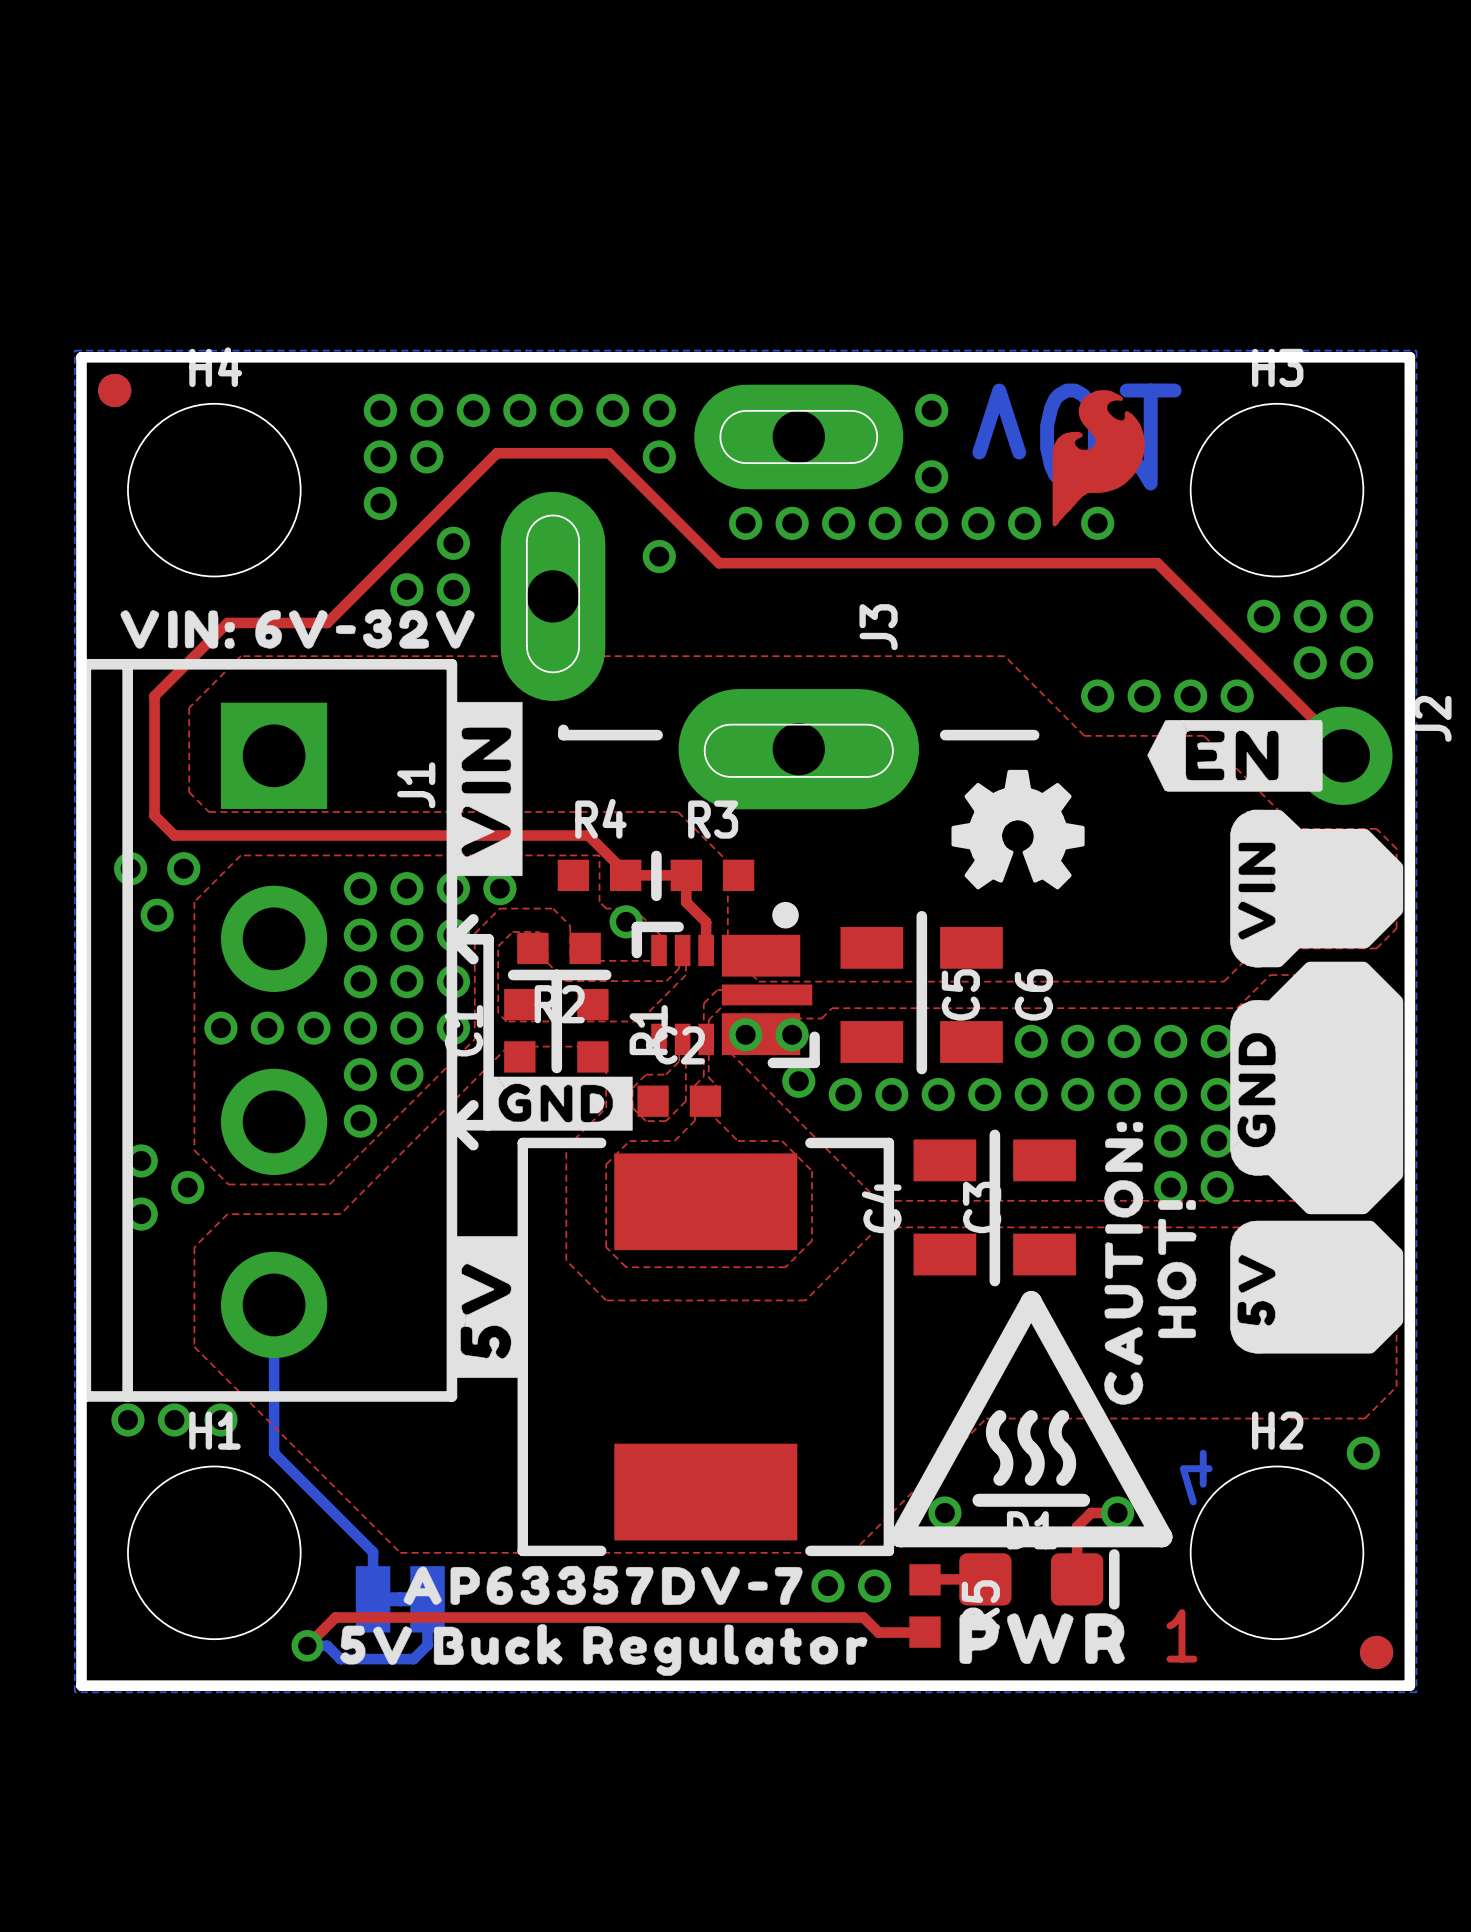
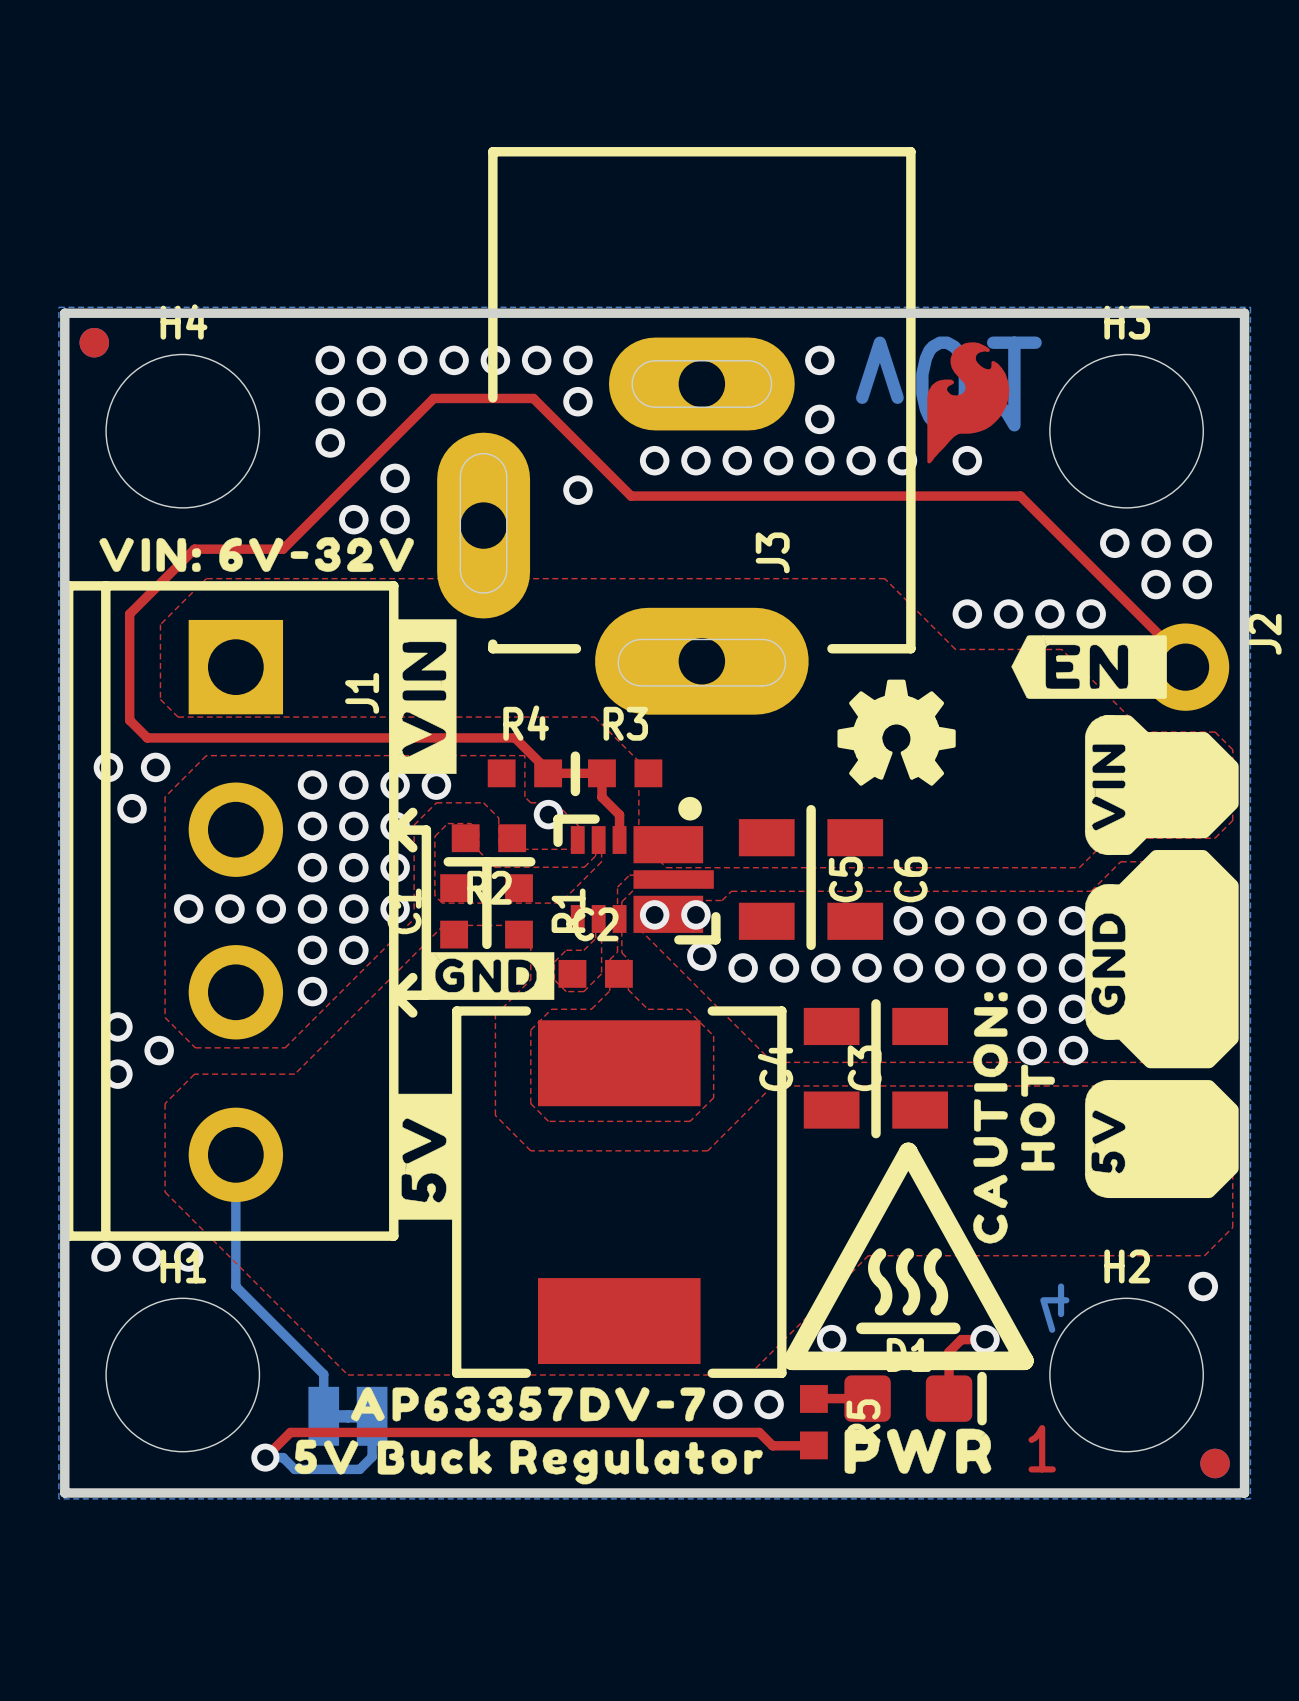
J3 footprint: [500, 384, 1040, 810] -> [437, 147, 916, 715]
drawing shape: [1239, 961, 1404, 1215] -> [1093, 850, 1239, 1069]
drawing shape: [1157, 1200, 1197, 1339] -> [1020, 1064, 1056, 1171]

